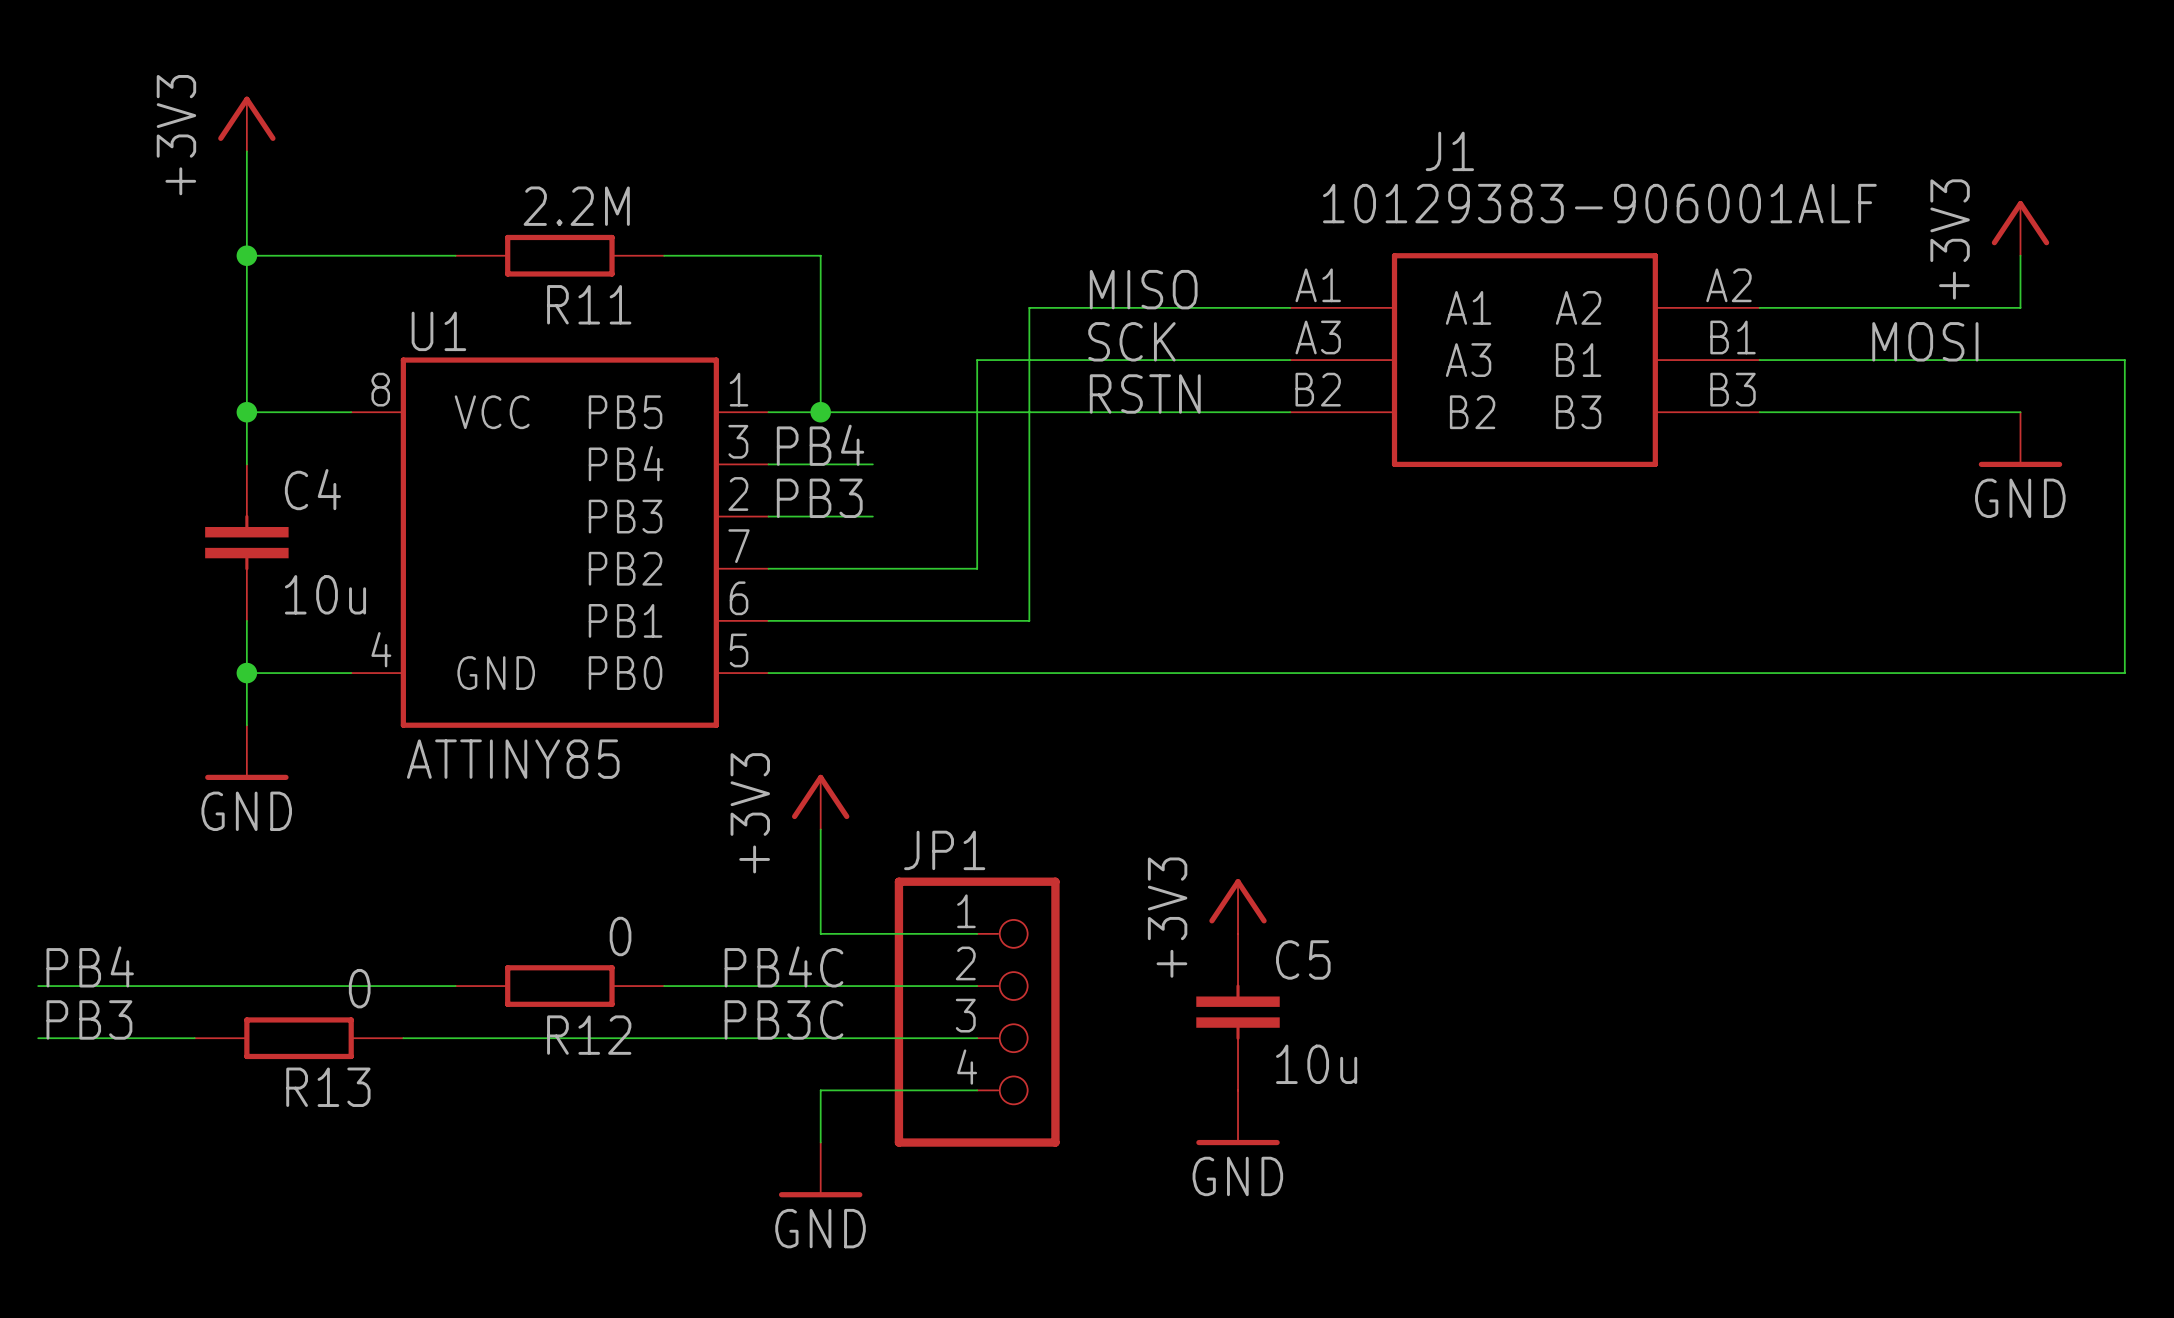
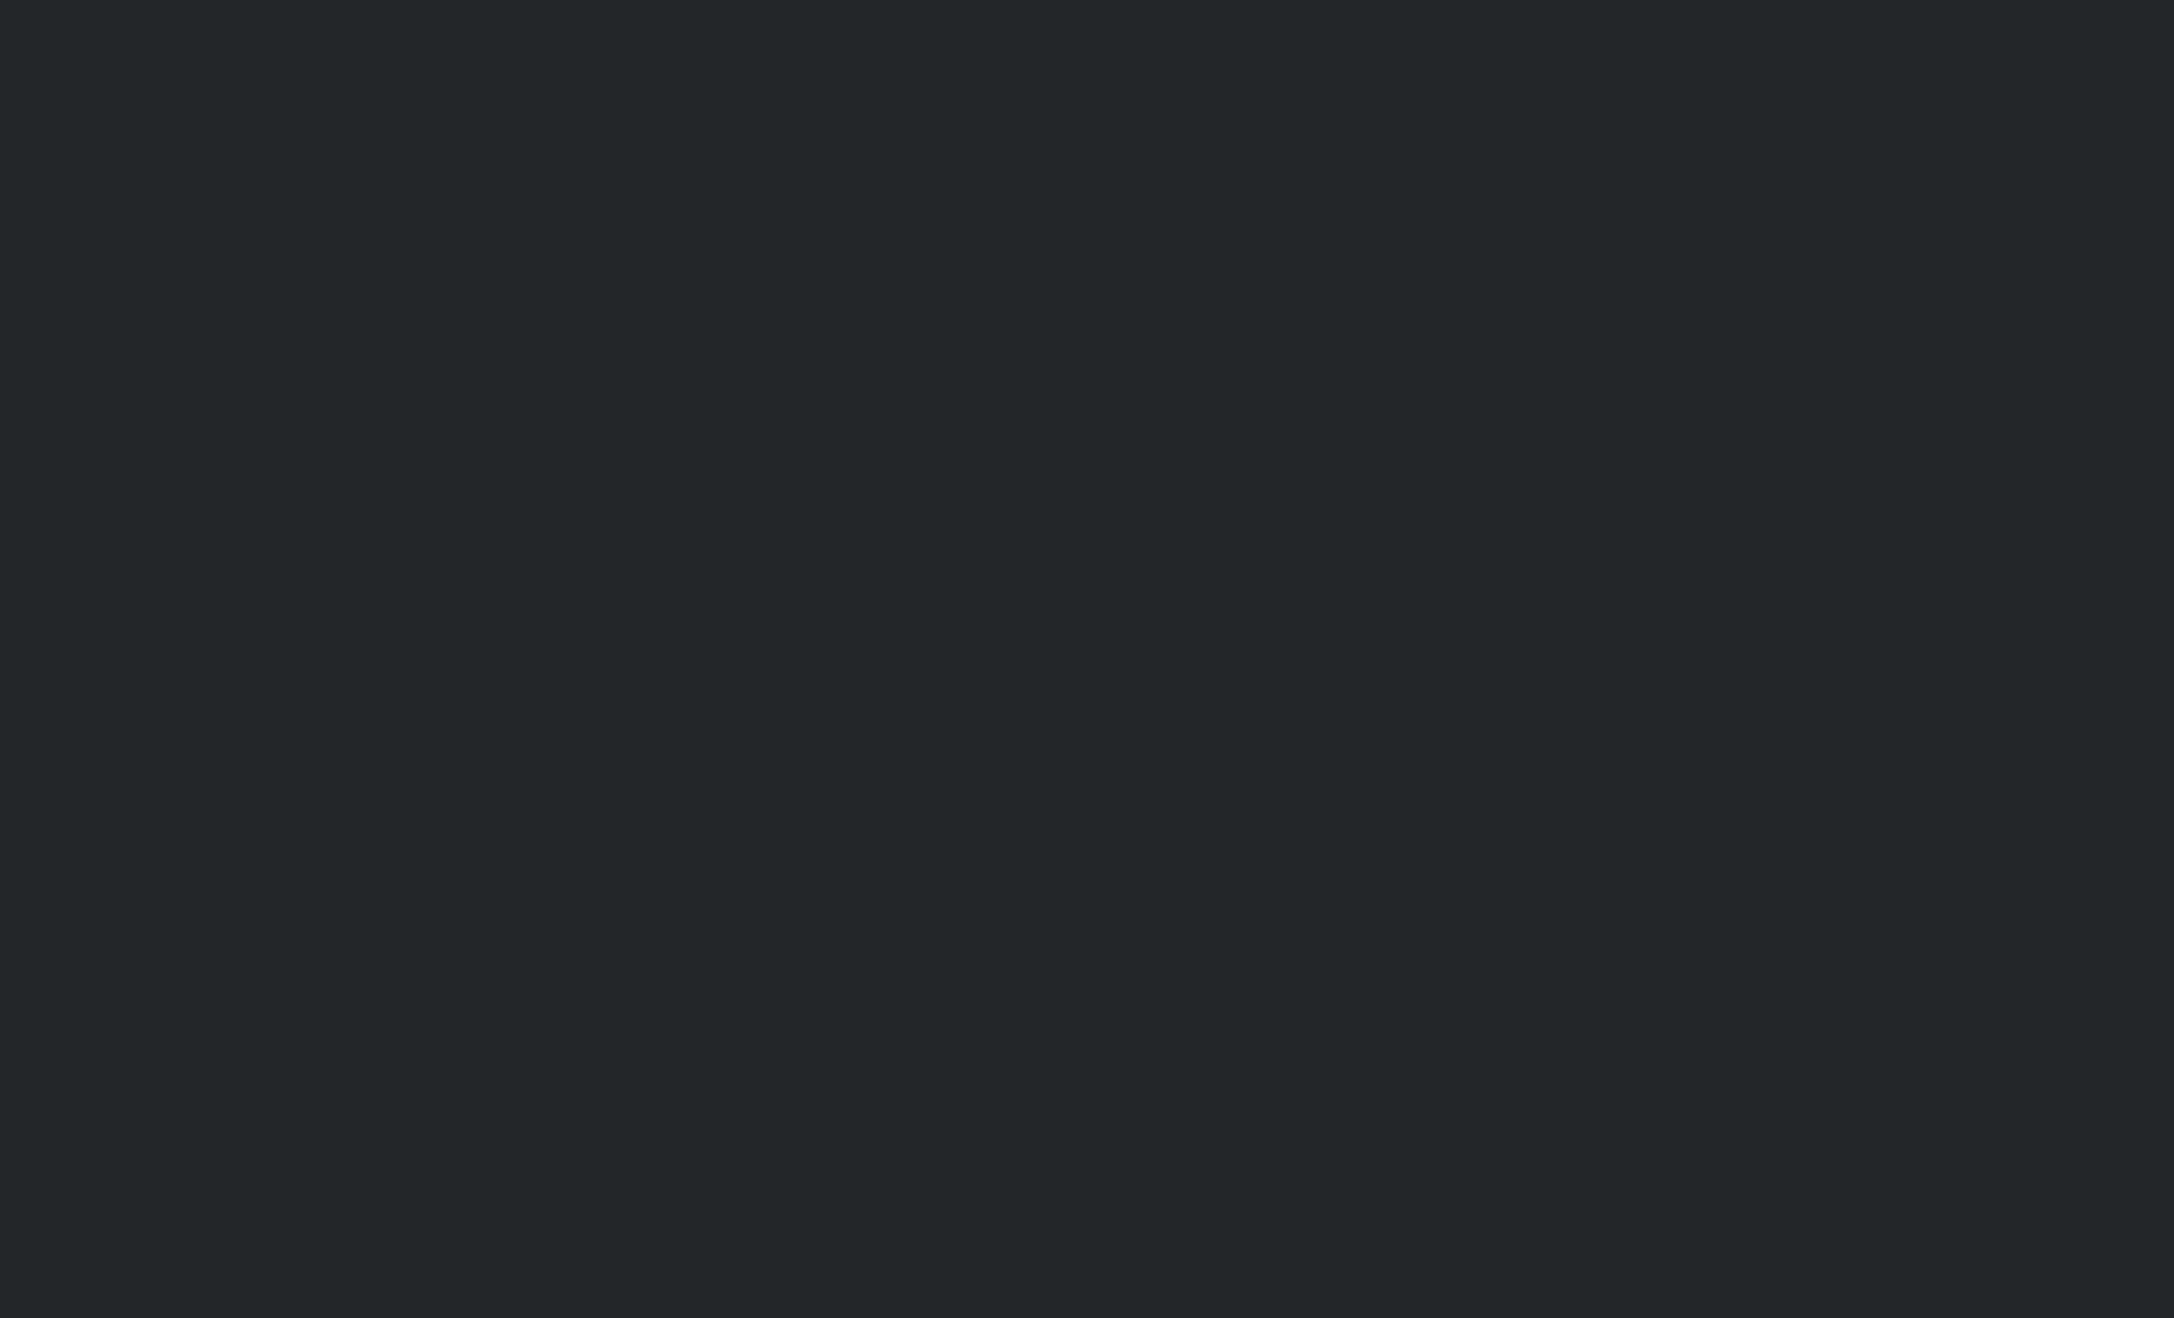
power symbol: +3V3 (246, 124) -> none
wire: (246, 151) (246, 464) -> none
power symbol: +3V3 (2020, 228) -> none
wire: (246, 255) (455, 255) -> none
junction: (246, 255) -> none
R11: 2.2M (559, 255) -> none
wire: (664, 255) (820, 255) (820, 412) -> none
wire: (2020, 255) (2020, 307) (1759, 307) -> none
label: MISO (1143, 289) -> none
wire: (1290, 307) (1029, 307) (1029, 620) (768, 620) -> none
label: SCK (1131, 341) -> none
label: MOSI (1925, 341) -> none
wire: (1290, 360) (977, 360) (977, 568) (768, 568) -> none
J1: 10129383-906001ALF (1524, 360) -> none
wire: (1759, 360) (2124, 360) (2124, 673) (768, 673) -> none
label: RSTN (1145, 393) -> none
wire: (246, 412) (351, 412) -> none
junction: (246, 412) -> none
wire: (768, 412) (1290, 412) -> none
junction: (820, 412) -> none
wire: (1759, 412) (2020, 412) -> none
power symbol: GND (2020, 439) -> none
label: PB4 (820, 445) -> none
wire: (768, 464) (872, 464) -> none
label: PB3 (819, 498) -> none
wire: (768, 516) (872, 516) -> none
C4: 10u (246, 542) -> none
U1: ATTINY85 (559, 542) -> none
wire: (246, 620) (246, 725) -> none
wire: (246, 673) (351, 673) -> none
junction: (246, 673) -> none
power symbol: GND (246, 752) -> none
power symbol: +3V3 (820, 802) -> none
wire: (820, 829) (820, 933) (977, 933) -> none
power symbol: +3V3 (1238, 906) -> none
label: PB4 (90, 966) -> none
label: PB4C (784, 966) -> none
wire: (38, 986) (455, 986) -> none
R12: 0 (559, 986) -> none
wire: (664, 986) (977, 986) -> none
JP1: (977, 1012) -> none
C5: 10u (1238, 1012) -> none
label: PB3 (89, 1019) -> none
label: PB3C (784, 1019) -> none
wire: (38, 1038) (194, 1038) -> none
R13: 0 (299, 1038) -> none
wire: (403, 1038) (977, 1038) -> none
wire: (977, 1090) (820, 1090) (820, 1142) -> none
power symbol: GND (1238, 1117) -> none
power symbol: GND (820, 1169) -> none

